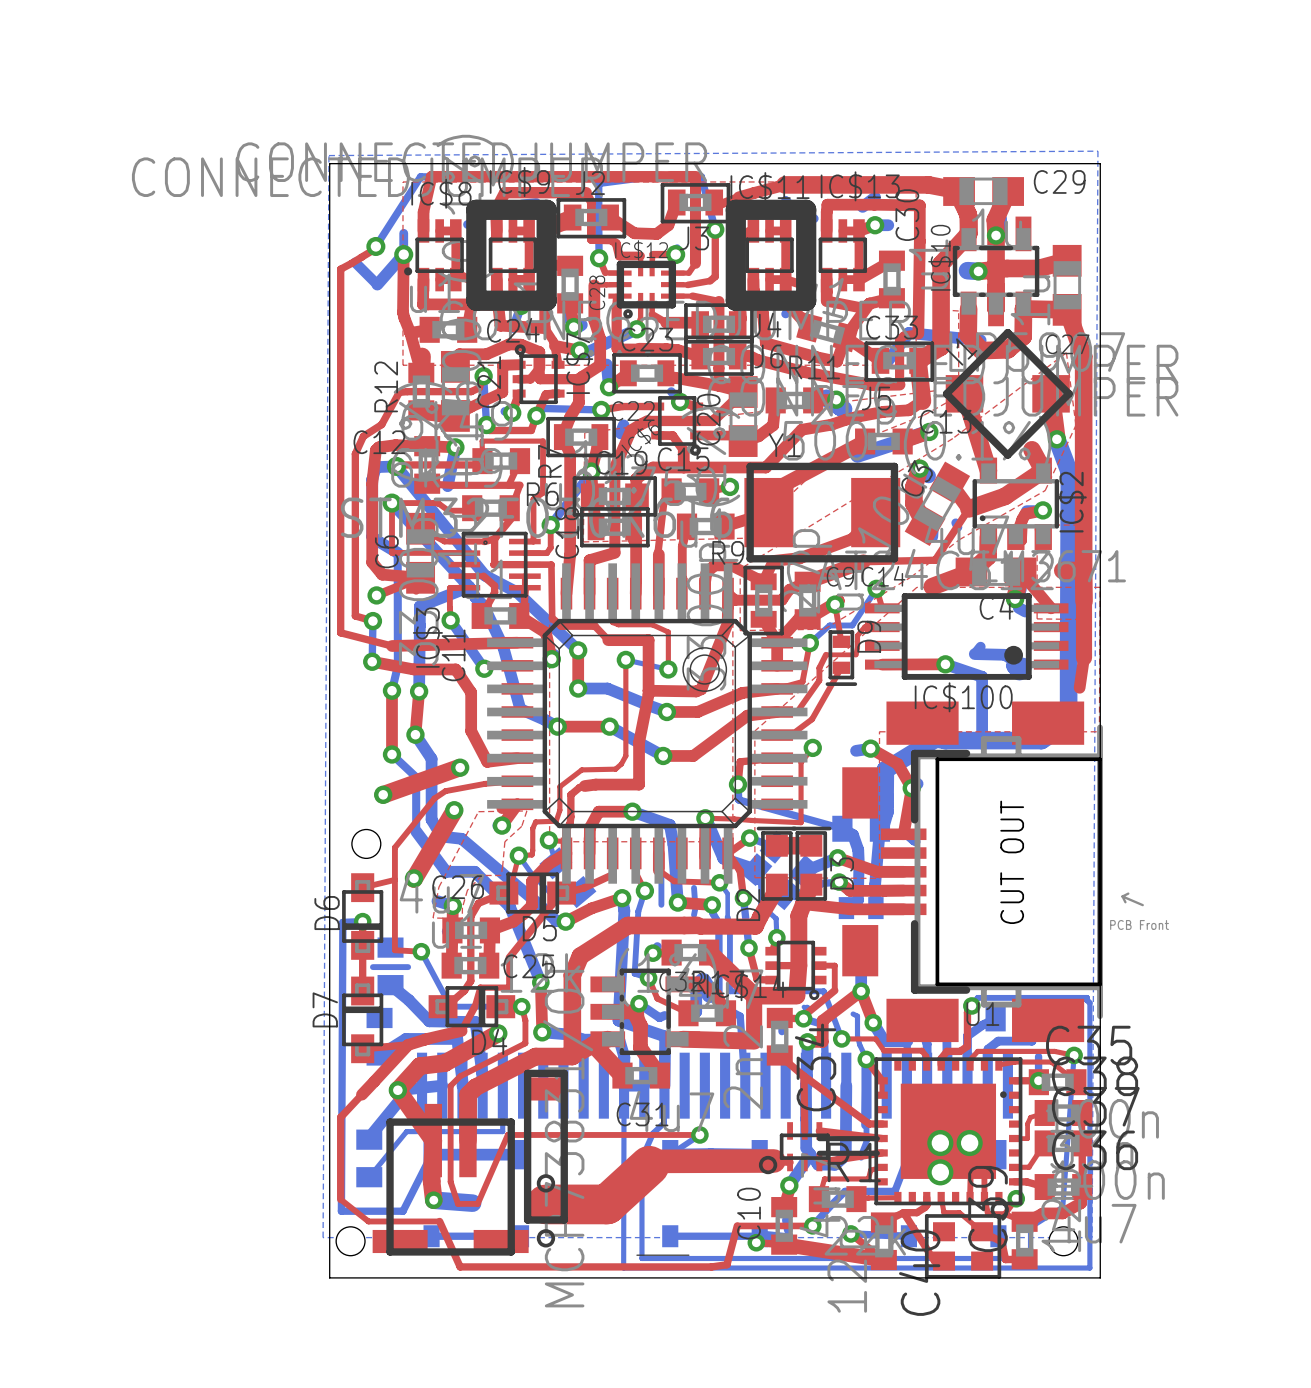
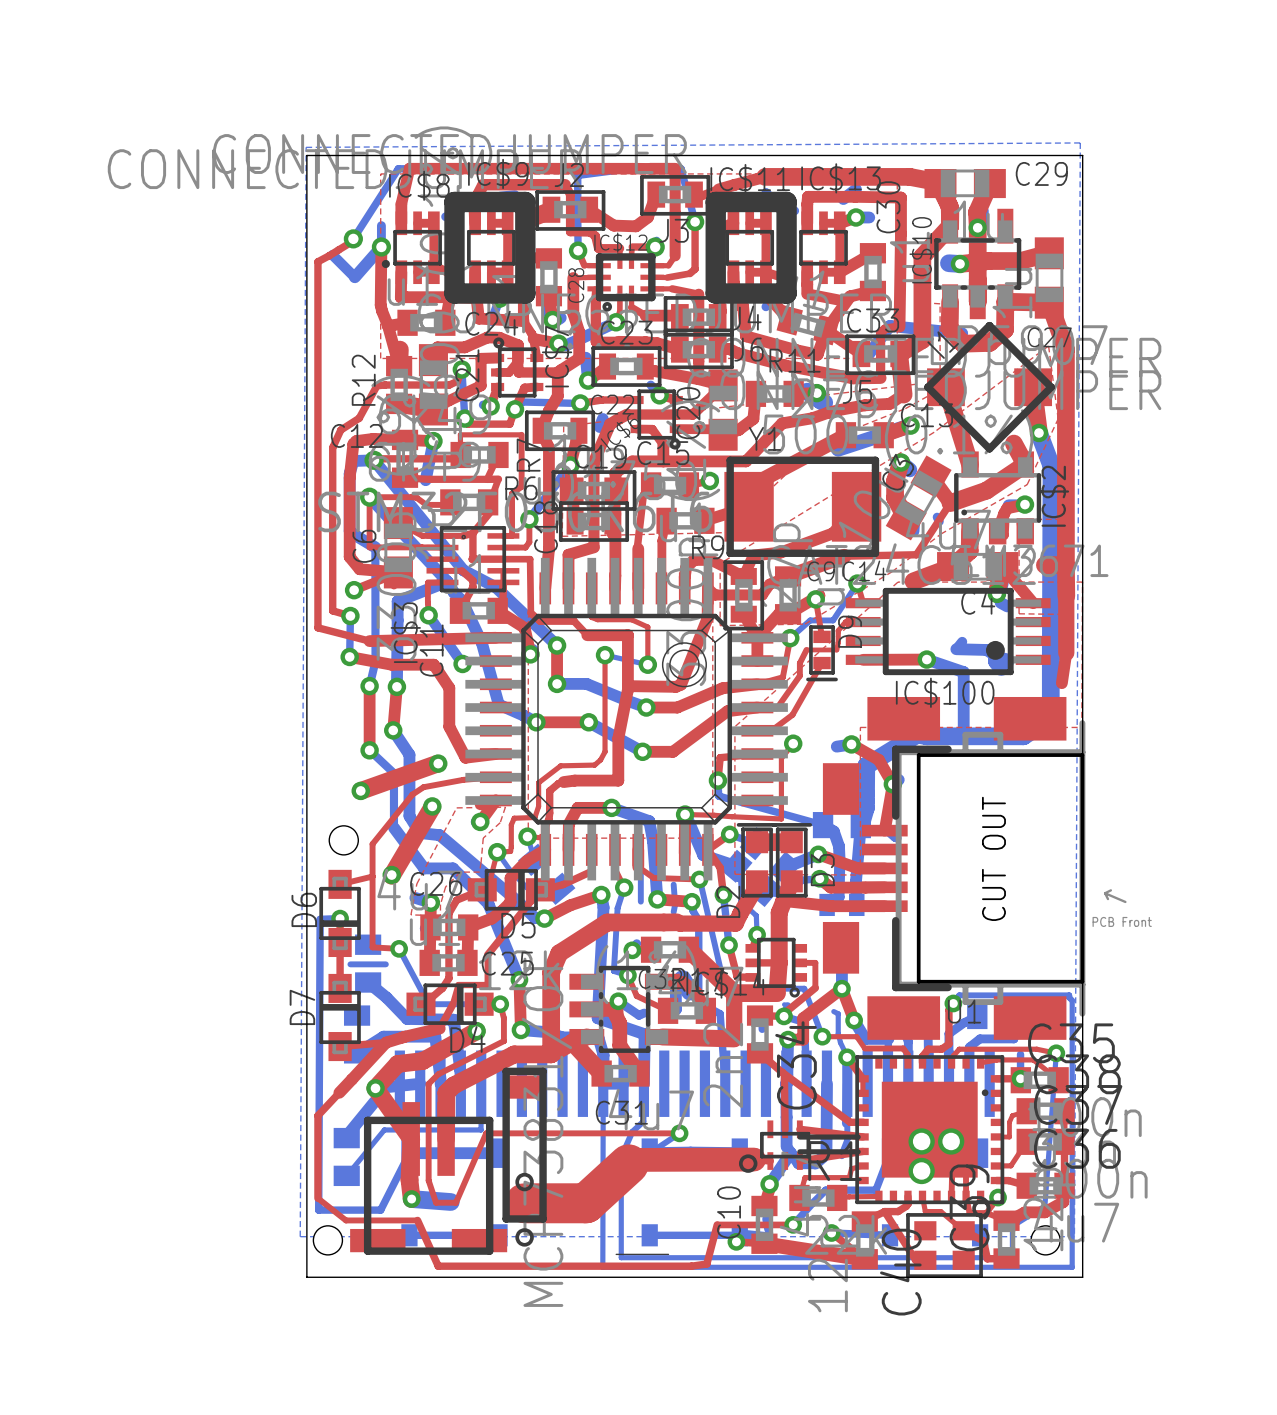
bottom track: (719, 882) (727, 893) (729, 991) (748, 991) -> (699, 878) (720, 970) (728, 988)

